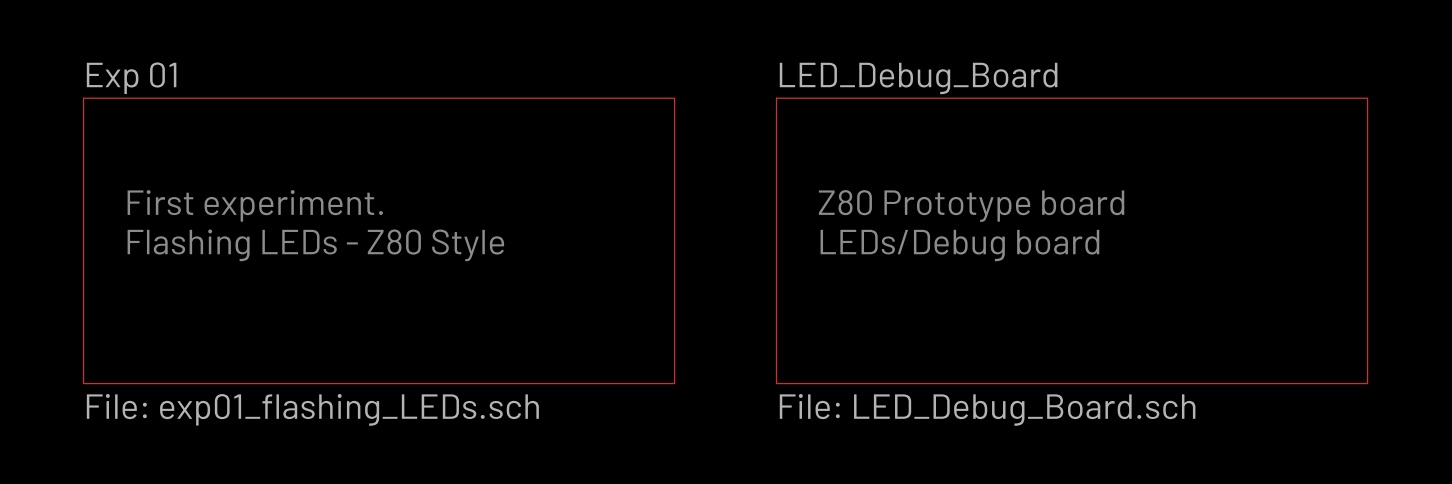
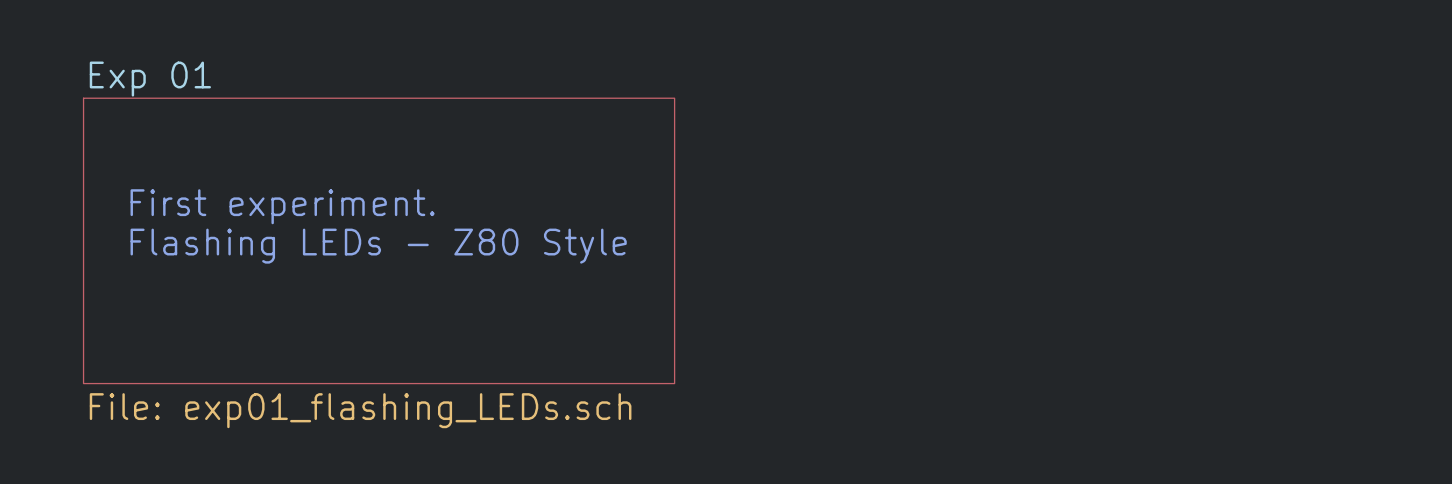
text: Z80 Prototype board (971, 205) -> none
sheet LED_Debug_Board: File: LED_Debug_Board.sch (1072, 240) -> none
text: LEDs/Debug board (959, 245) -> none

